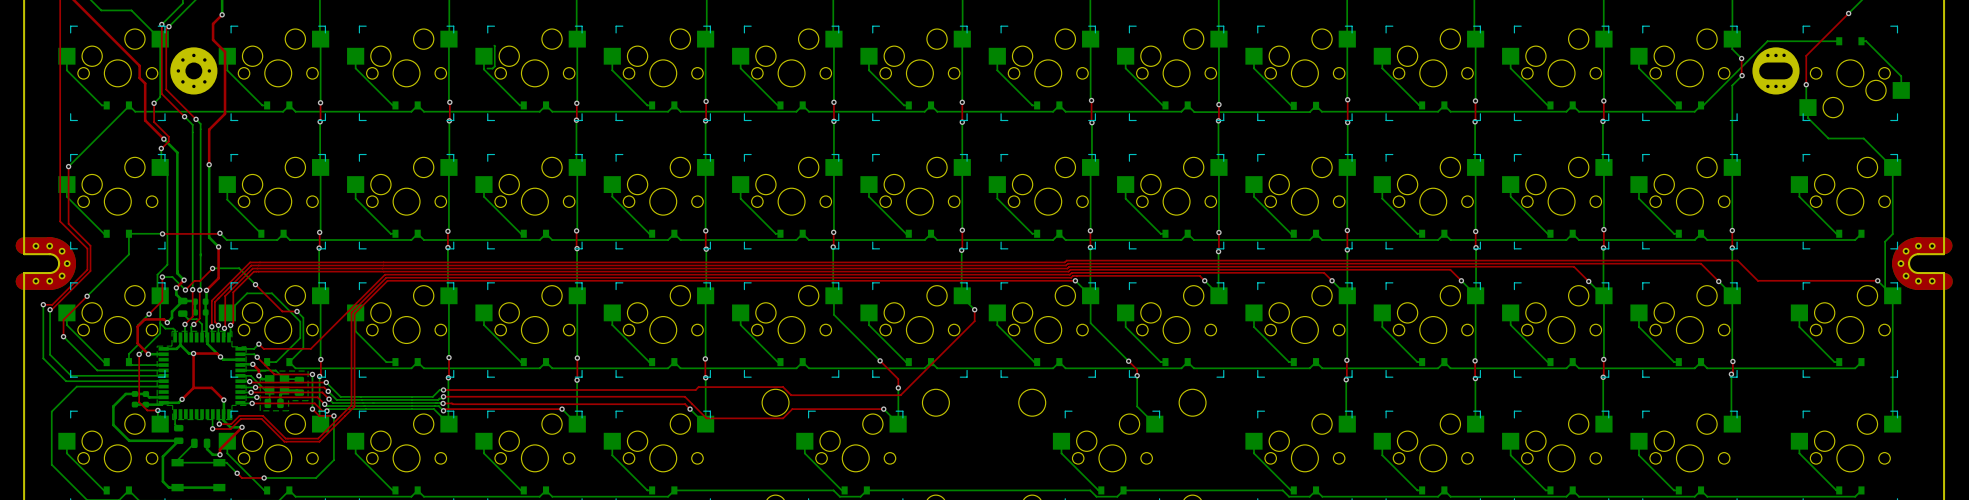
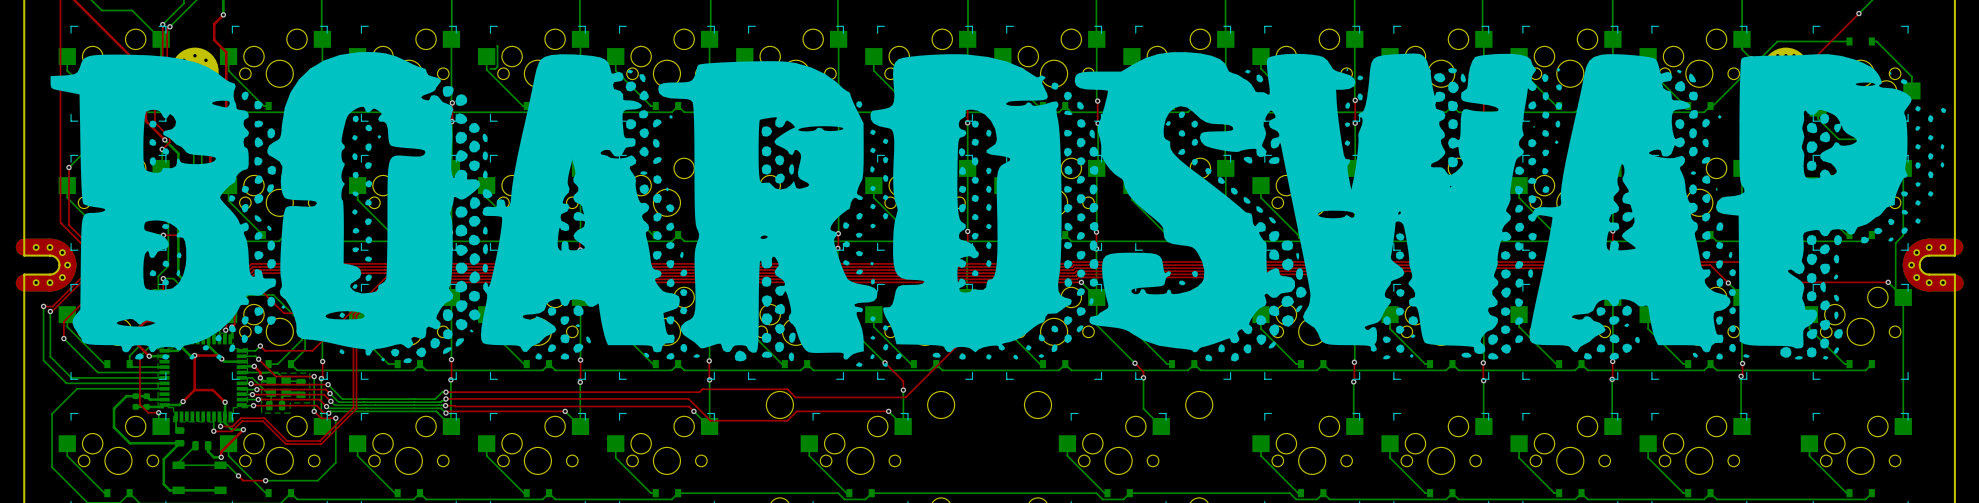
drawing: none -> [50, 51, 1947, 367]

